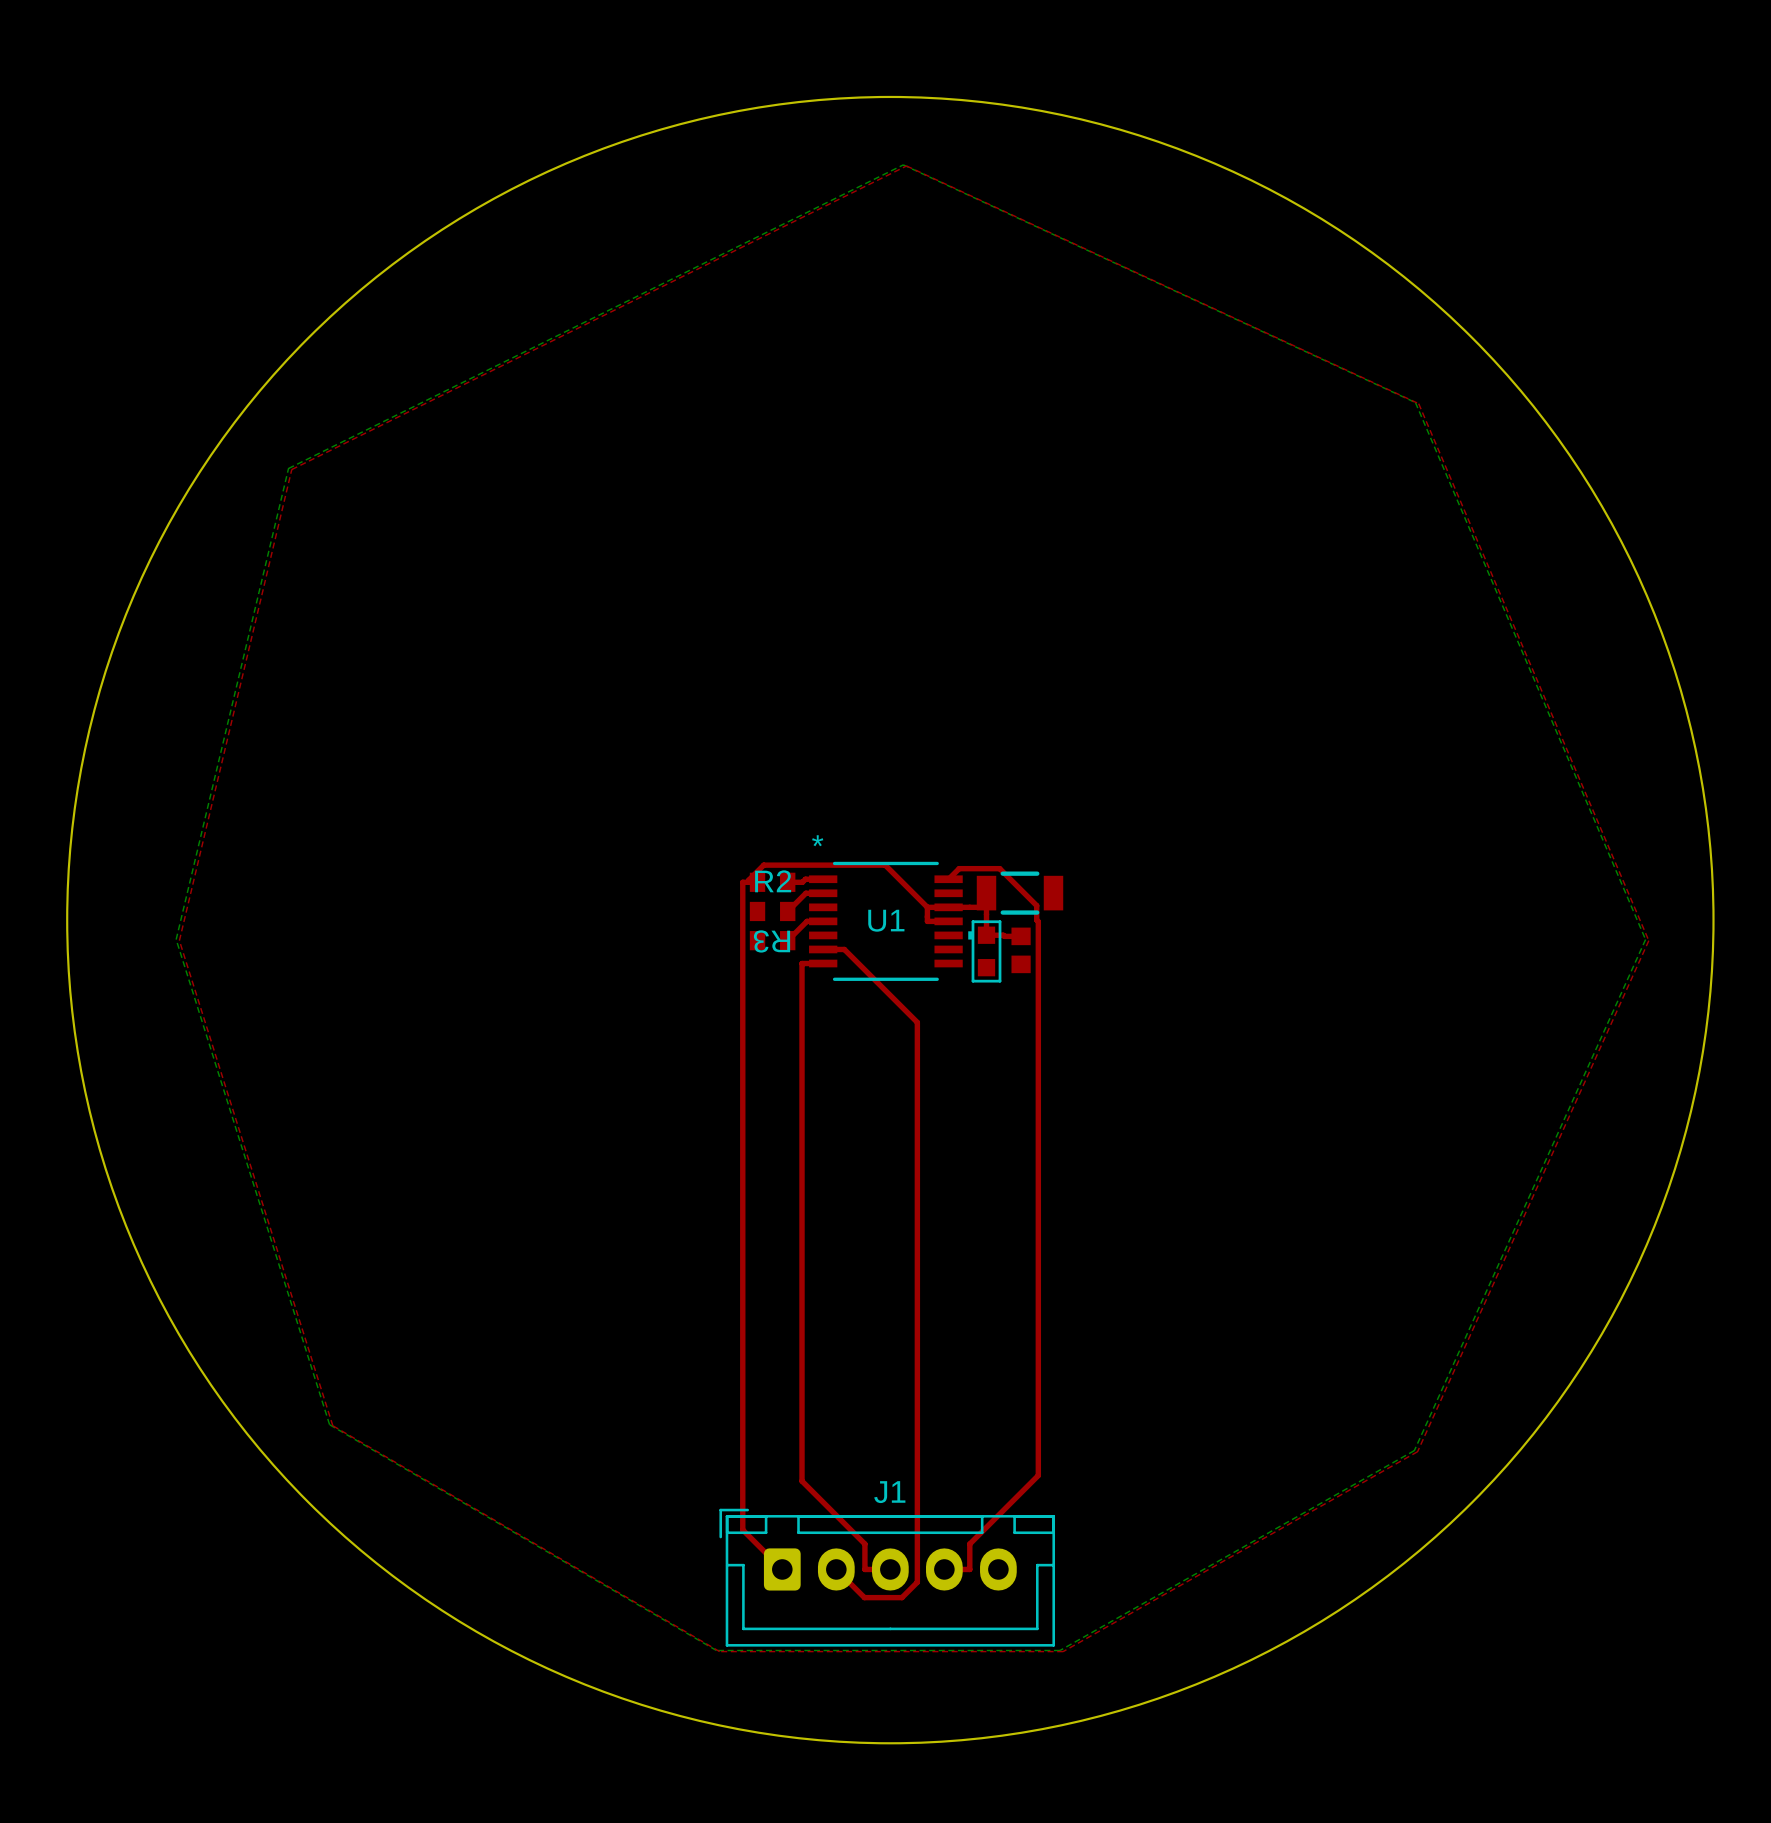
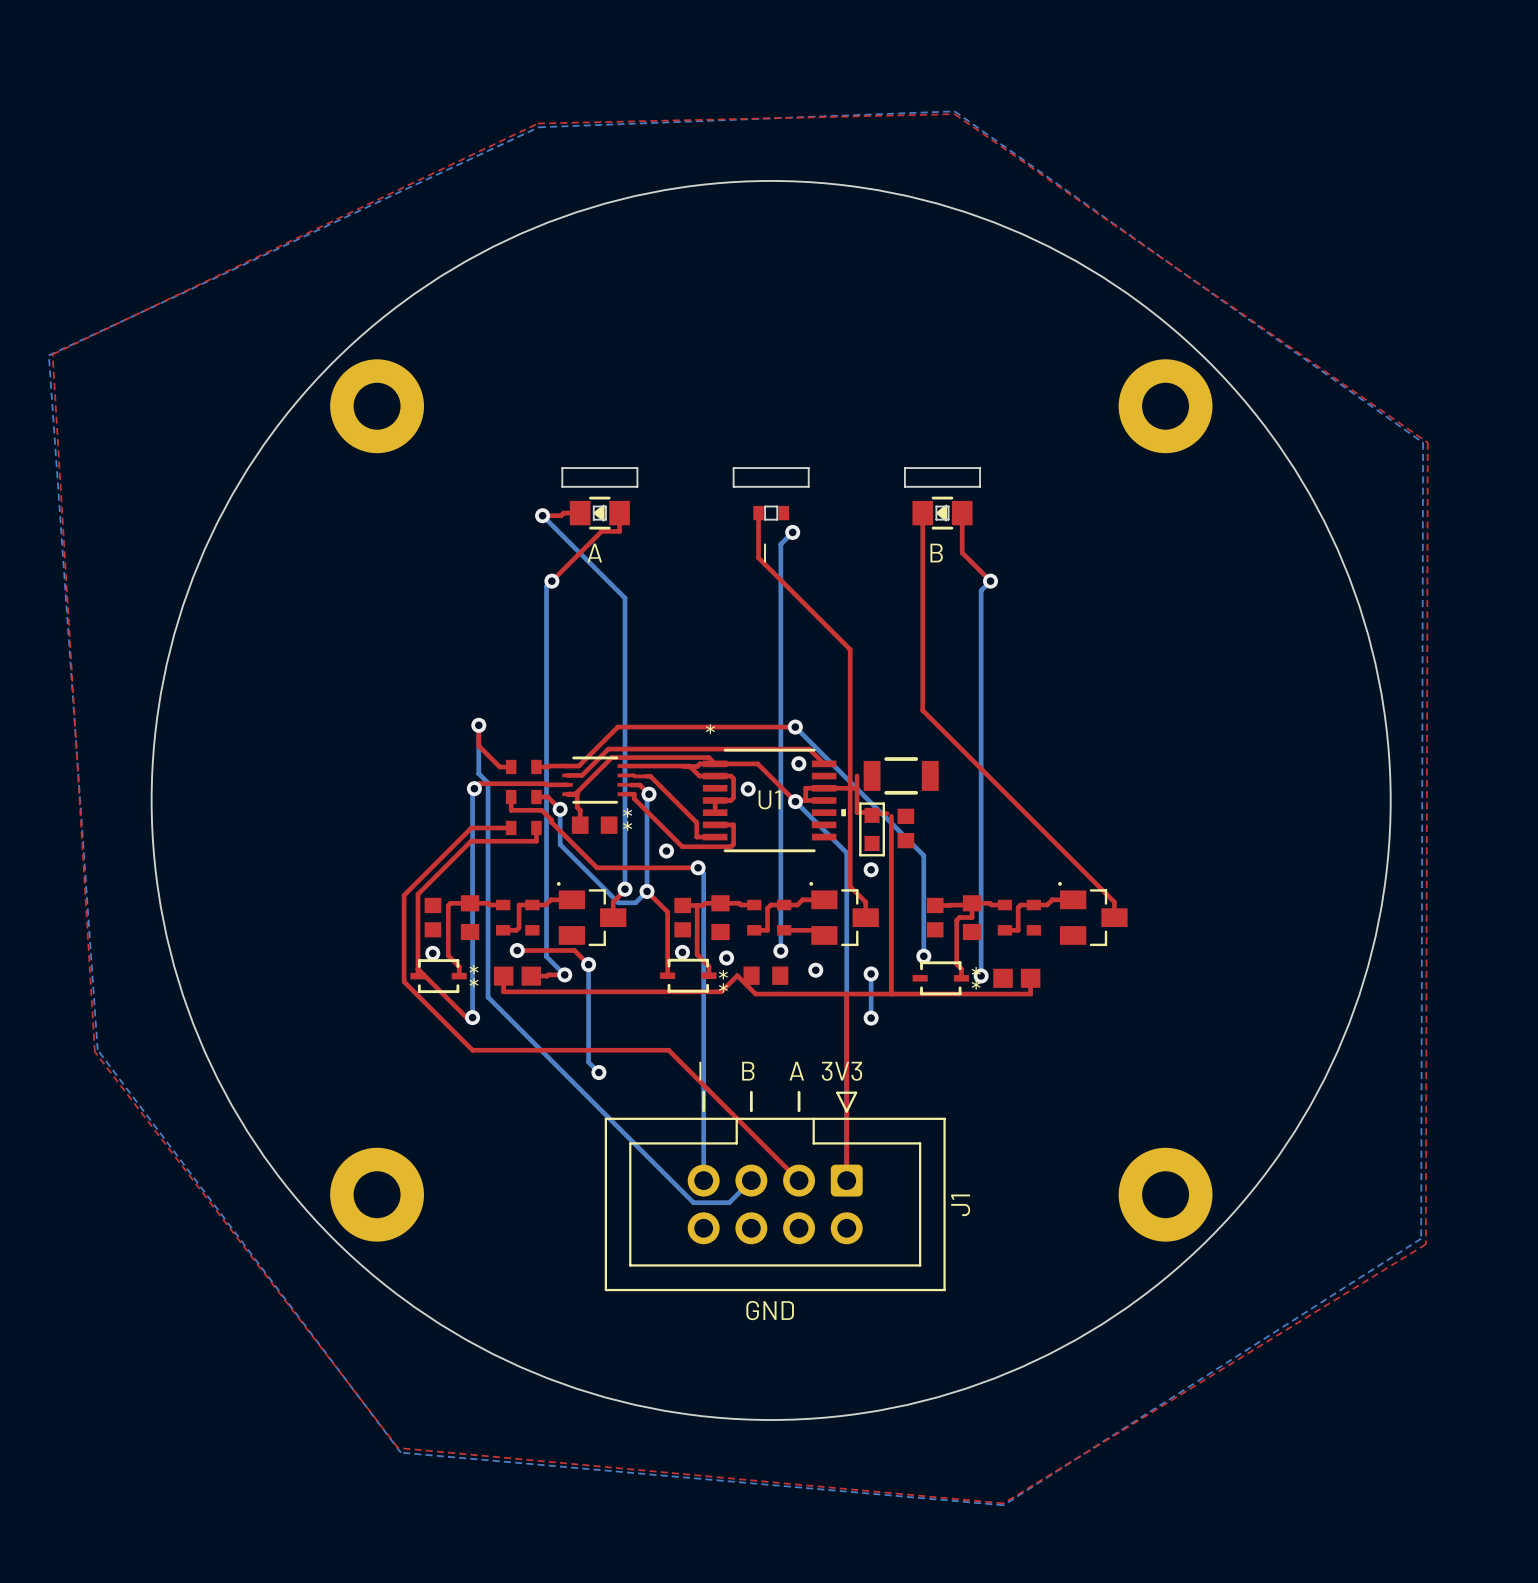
round board edge size: [66, 95, 1715, 1745] -> [150, 180, 1392, 1421]
bottom zone outline: (903, 164) (288, 468) (176, 939) (329, 1424) (716, 1650) (1059, 1650) (1414, 1450) (1645, 939) (1415, 402) (903, 164) -> (954, 111) (538, 127) (48, 355) (97, 1050) (400, 1452) (1003, 1505) (1421, 1238) (1423, 442) (954, 111)
top zone outline: (906, 165) (291, 469) (179, 940) (332, 1425) (719, 1651) (1063, 1651) (1417, 1451) (1648, 940) (1418, 403) (906, 165) -> (954, 114) (537, 123) (52, 354) (94, 1051) (398, 1448) (1003, 1503) (1425, 1244) (1427, 442) (954, 114)
part: none -> (377, 406)
part: none -> (1165, 406)
board edge: none -> (562, 468) (637, 468) (637, 486) (562, 486) (562, 468)
board edge: none -> (733, 468) (808, 468) (808, 486) (733, 486) (733, 468)
board edge: none -> (904, 468) (980, 468) (980, 486) (904, 486) (904, 468)
board edge: none -> (593, 506) (605, 506) (605, 519) (593, 519) (593, 506)
board edge: none -> (765, 506) (777, 506) (777, 519) (765, 519) (765, 506)
board edge: none -> (936, 506) (948, 506) (948, 519) (936, 519) (936, 506)
top track: none -> (580, 513) (542, 515)
part: none -> (599, 513)
top track: none -> (619, 513) (619, 531) (601, 531) (551, 581)
top track: none -> (758, 513) (758, 557) (850, 649) (850, 886) (865, 902) (865, 917)
part: none -> (771, 513)
top track: none -> (922, 513) (922, 710) (1114, 902) (1114, 917)
part: none -> (942, 513)
top track: none -> (962, 513) (962, 552) (990, 581)
bottom track: none -> (542, 515) (625, 598) (625, 889)
via: none -> (542, 515)
bottom track: none -> (792, 532) (780, 544) (780, 951)
via: none -> (792, 532)
text: none -> A (594, 553)
text: none -> I (765, 553)
text: none -> B (936, 553)
bottom track: none -> (551, 581) (546, 586) (546, 956) (564, 974)
via: none -> (551, 581)
bottom track: none -> (990, 581) (981, 590) (981, 975)
via: none -> (990, 581)
top track: none -> (478, 725) (478, 745) (499, 766) (511, 766)
bottom track: none -> (478, 725) (478, 773) (488, 782) (488, 997) (693, 1202) (729, 1202) (751, 1180)
via: none -> (478, 725)
top track: none -> (795, 727) (617, 727) (578, 766) (536, 766)
bottom track: none -> (795, 727) (923, 855) (923, 956)
via: none -> (795, 727)
via: none -> (798, 763)
top track: (948, 879) (959, 868) (999, 868) (1036, 905) (1038, 921) (1038, 1475) (969, 1544) (969, 1569) (944, 1569) -> (824, 763) (809, 749) (608, 749) (582, 775) (567, 775)
part: none -> (523, 766)
top track: (748, 882) (763, 865) (885, 865) (927, 907) -> none
top track: (757, 882) (742, 882) (742, 1529) (782, 1569) -> none
R2: (772, 882) -> none
top track: (805, 893) (787, 911) -> (700, 776) (689, 766) (622, 766)
top track: none -> (715, 776) (730, 776) (733, 778) (733, 797) (730, 800) (715, 800) (715, 812)
part position: (1020, 893) -> (901, 775)
part: none -> (595, 780)
top track: none -> (567, 784) (479, 783) (474, 788)
top track: none -> (629, 785) (639, 785) (649, 794)
bottom track: none -> (474, 788) (472, 790) (472, 1017)
via: none -> (474, 788)
via: none -> (748, 789)
part: (772, 911) -> none
top track: none -> (567, 794) (577, 794) (580, 825)
top track: none -> (575, 794) (611, 757) (708, 757) (715, 763) (757, 763) (795, 801) (805, 800)
bottom track: none -> (649, 794) (647, 796) (647, 891) (635, 902) (618, 902) (560, 844) (560, 809)
via: none -> (649, 794)
top track: none -> (511, 797) (511, 810) (541, 810) (597, 867) (698, 867)
part: none -> (523, 797)
top track: none -> (536, 797) (547, 797) (560, 809)
top track: (823, 921) (806, 921) (787, 940) -> none
bottom track: none -> (795, 801) (846, 852) (846, 1180)
via: none -> (795, 801)
via: none -> (560, 809)
top track: none -> (891, 816) (891, 994)
R3: (772, 940) -> none
part: none -> (594, 825)
top track: (844, 949) (917, 1022) (917, 1582) (902, 1597) (864, 1597) (836, 1569) -> (733, 824) (733, 844) (731, 846) (682, 846) (634, 798) (634, 794) (622, 794)
part position: (1021, 950) -> (905, 828)
part position: (986, 951) -> (872, 829)
top track: none -> (511, 827) (471, 827) (404, 895) (404, 981) (472, 1050) (668, 1050) (799, 1180)
part: none -> (523, 827)
top track: none -> (536, 827) (536, 841) (471, 841) (417, 894) (417, 976)
top track: (802, 963) (802, 1481) (864, 1544) (864, 1569) (890, 1569) -> (696, 837) (696, 822) (650, 776) (622, 775)
via: none -> (666, 851)
bottom track: none -> (698, 867) (703, 873) (703, 1180)
via: none -> (698, 867)
via: none -> (871, 869)
top track: none -> (625, 889) (613, 902) (613, 917)
via: none -> (625, 889)
top track: none -> (647, 891) (667, 912) (667, 975)
via: none -> (647, 891)
top track: none -> (571, 899) (550, 899) (545, 905) (519, 905) (519, 927) (516, 930) (503, 930)
top track: none -> (824, 899) (802, 899) (797, 905) (770, 905) (767, 908) (767, 930) (754, 930)
top track: none -> (1073, 899) (1052, 899) (1047, 905) (1020, 905) (1018, 907) (1018, 930) (1004, 930)
top track: none -> (503, 905) (450, 903) (448, 905) (448, 955) (459, 966) (459, 976)
top track: none -> (754, 905) (705, 903) (702, 905) (682, 905)
top track: none -> (972, 905) (935, 905)
top track: none -> (1004, 905) (972, 903) (972, 917) (959, 917) (956, 920) (956, 964) (961, 968) (961, 978)
top track: none -> (697, 905) (697, 954) (708, 966) (708, 975)
part: none -> (591, 914)
part: none -> (844, 914)
part: none -> (1092, 914)
part: none -> (432, 917)
part: none -> (470, 917)
part: none -> (503, 917)
part: none -> (532, 917)
part: none -> (682, 917)
part: none -> (720, 917)
part: none -> (754, 917)
part: none -> (784, 917)
part: none -> (935, 917)
part: none -> (972, 917)
part: none -> (1004, 917)
part: none -> (1033, 917)
top track: none -> (784, 930) (819, 930) (824, 935)
top track: none -> (517, 950) (574, 950) (588, 964)
via: none -> (517, 950)
via: none -> (780, 951)
via: none -> (682, 952)
via: none -> (432, 953)
via: none -> (923, 956)
via: none -> (726, 958)
bottom track: none -> (588, 964) (588, 1062) (598, 1072)
via: none -> (588, 964)
top track: none -> (417, 969) (466, 1017) (472, 1017)
via: none -> (815, 970)
bottom track: none -> (871, 973) (871, 1018)
via: none -> (871, 973)
top track: none -> (564, 974) (531, 976)
via: none -> (564, 974)
part: none -> (438, 976)
top track: none -> (503, 976) (503, 991) (721, 991) (737, 975) (755, 994) (1030, 994) (1030, 978)
part: none -> (517, 976)
part: none -> (688, 975)
part: none -> (765, 975)
via: none -> (981, 975)
part: none -> (940, 978)
part: none -> (1016, 978)
top track: none -> (846, 994) (846, 1180)
via: none -> (472, 1017)
via: none -> (871, 1018)
text: none -> I (700, 1071)
text: none -> B (748, 1071)
text: none -> A (796, 1071)
text: none -> 3V3 (841, 1071)
via: none -> (598, 1072)
line: none -> (703, 1092) (703, 1110)
line: none -> (751, 1092) (751, 1110)
line: none -> (799, 1092) (799, 1110)
part: none -> (377, 1194)
part: none -> (1165, 1194)
J1 name position: J1 (889, 1492) -> J1 (960, 1205)
J1 footprint: [719, 1508, 1056, 1647] -> [604, 1091, 946, 1292]
text: none -> GND (770, 1310)

